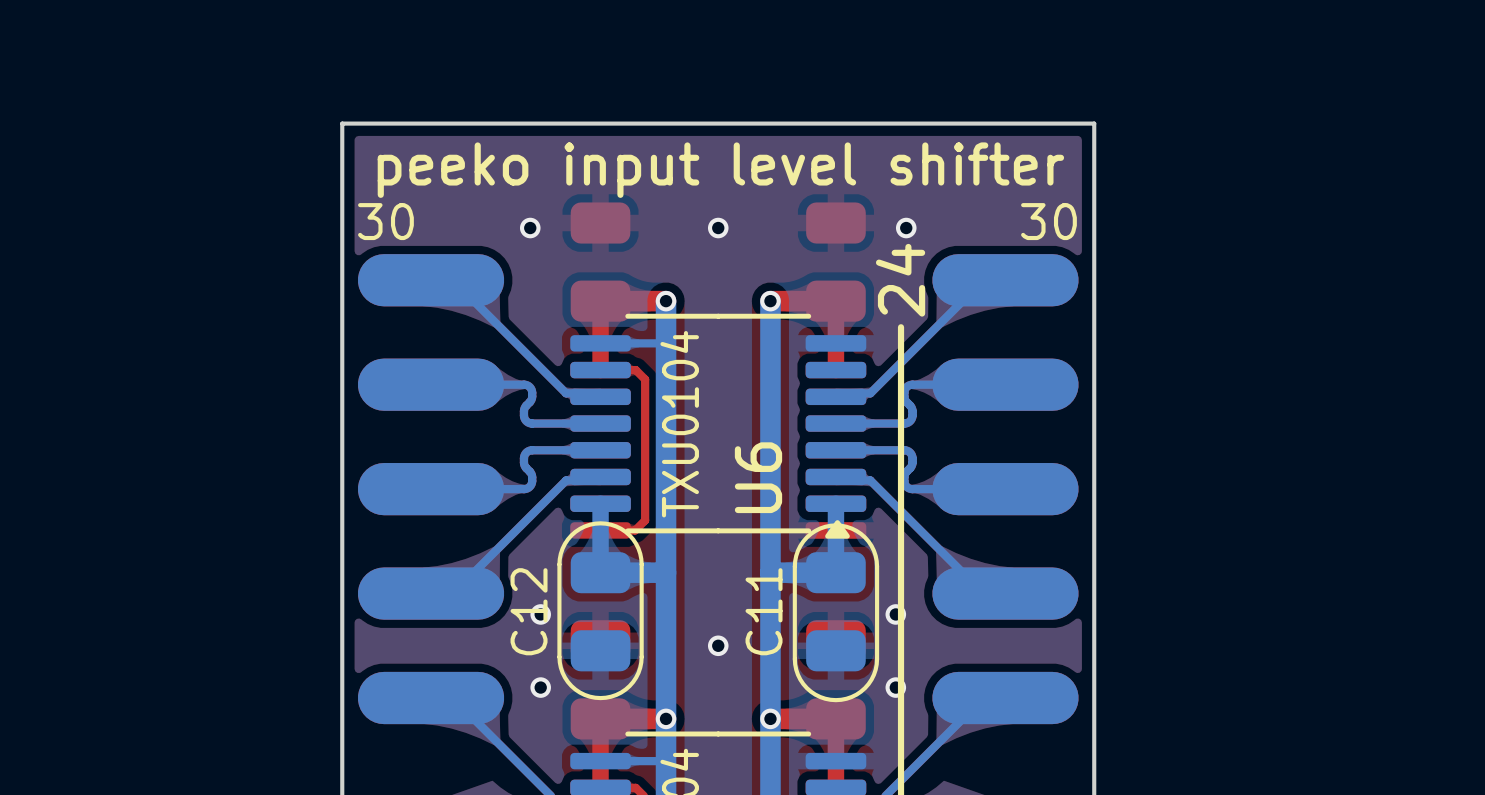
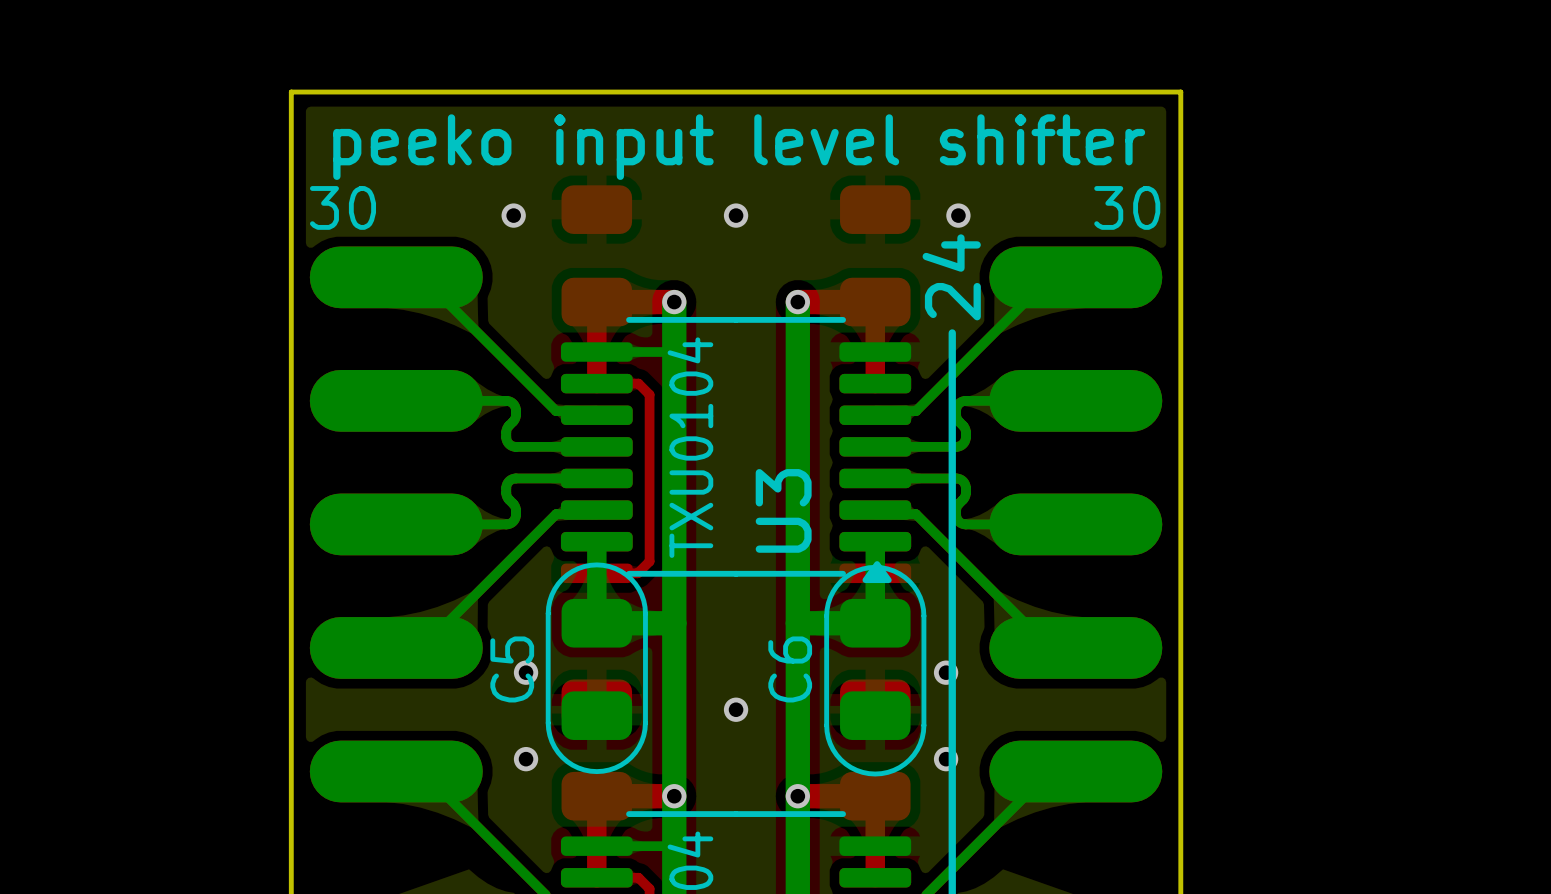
U6 name: U6 (758, 477) -> U3 (783, 510)
C12 name: C12 (529, 611) -> C5 (512, 669)
C11 name: C11 (764, 611) -> C6 (790, 669)

